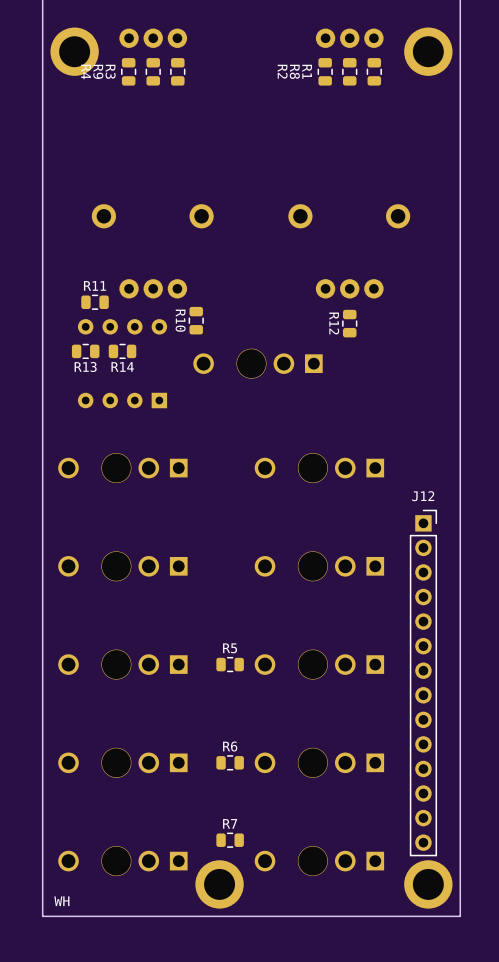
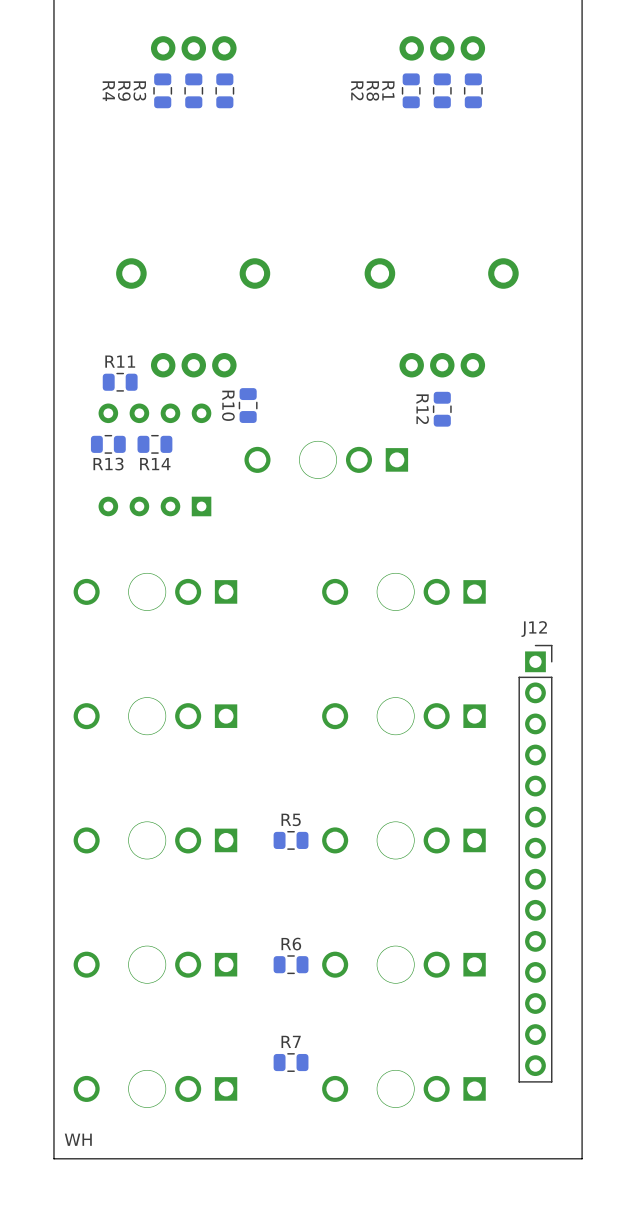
part: (74, 51) -> none
part: (428, 51) -> none
part: (219, 884) -> none
part: (428, 884) -> none

